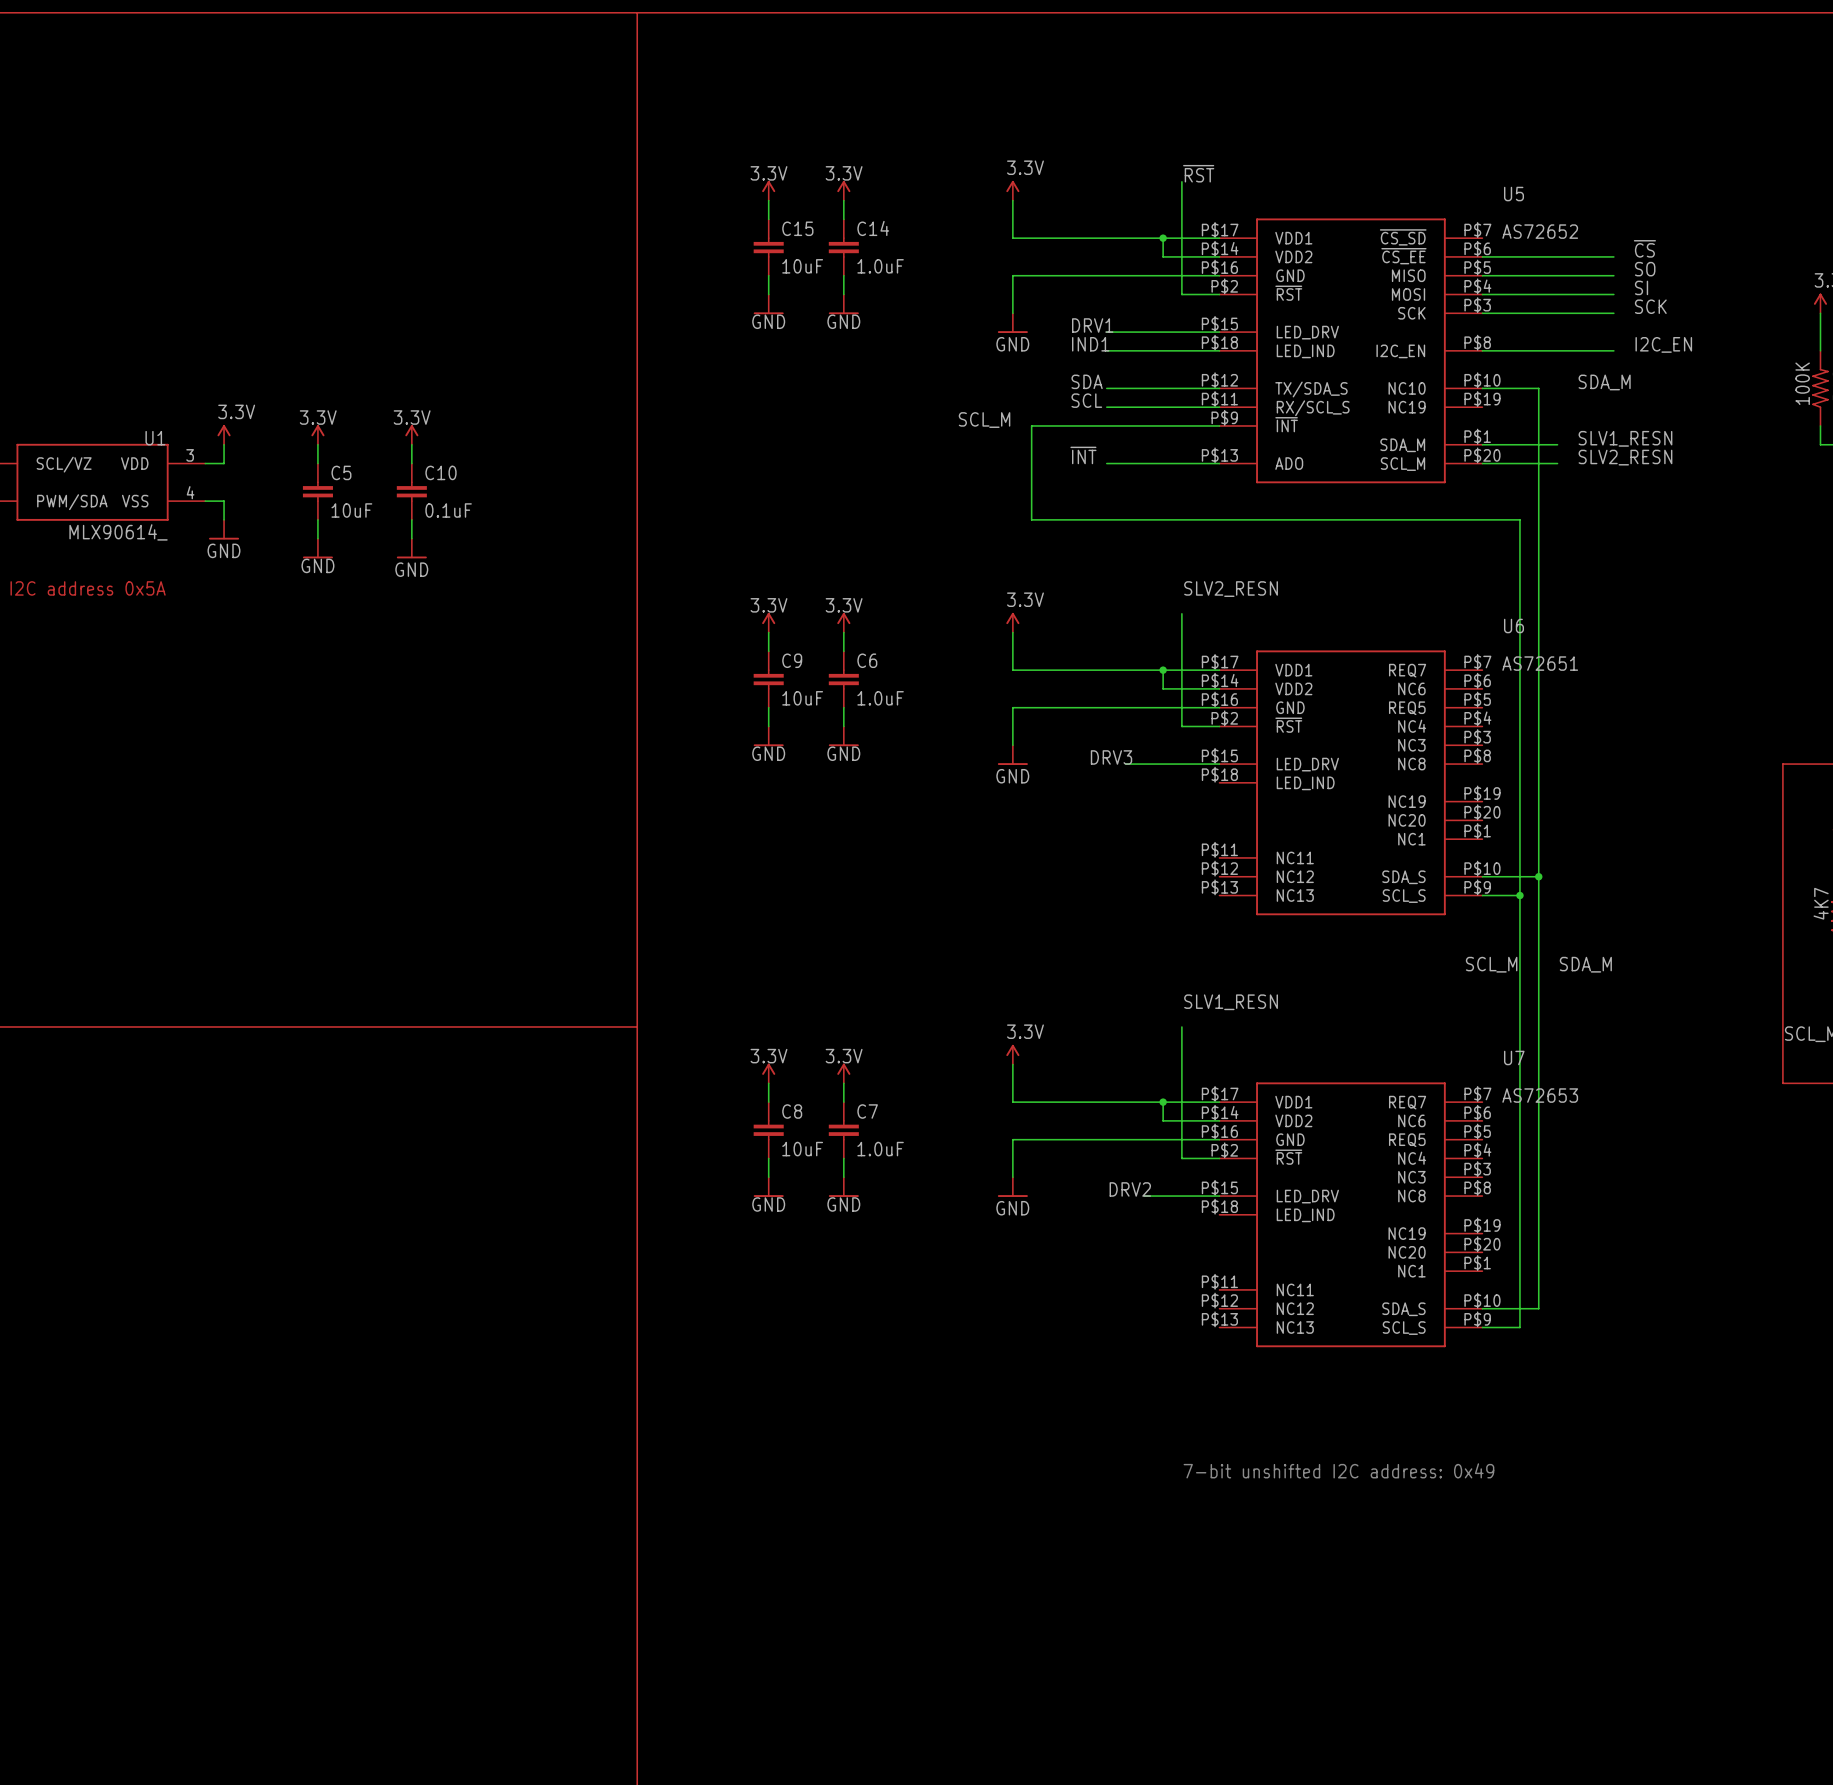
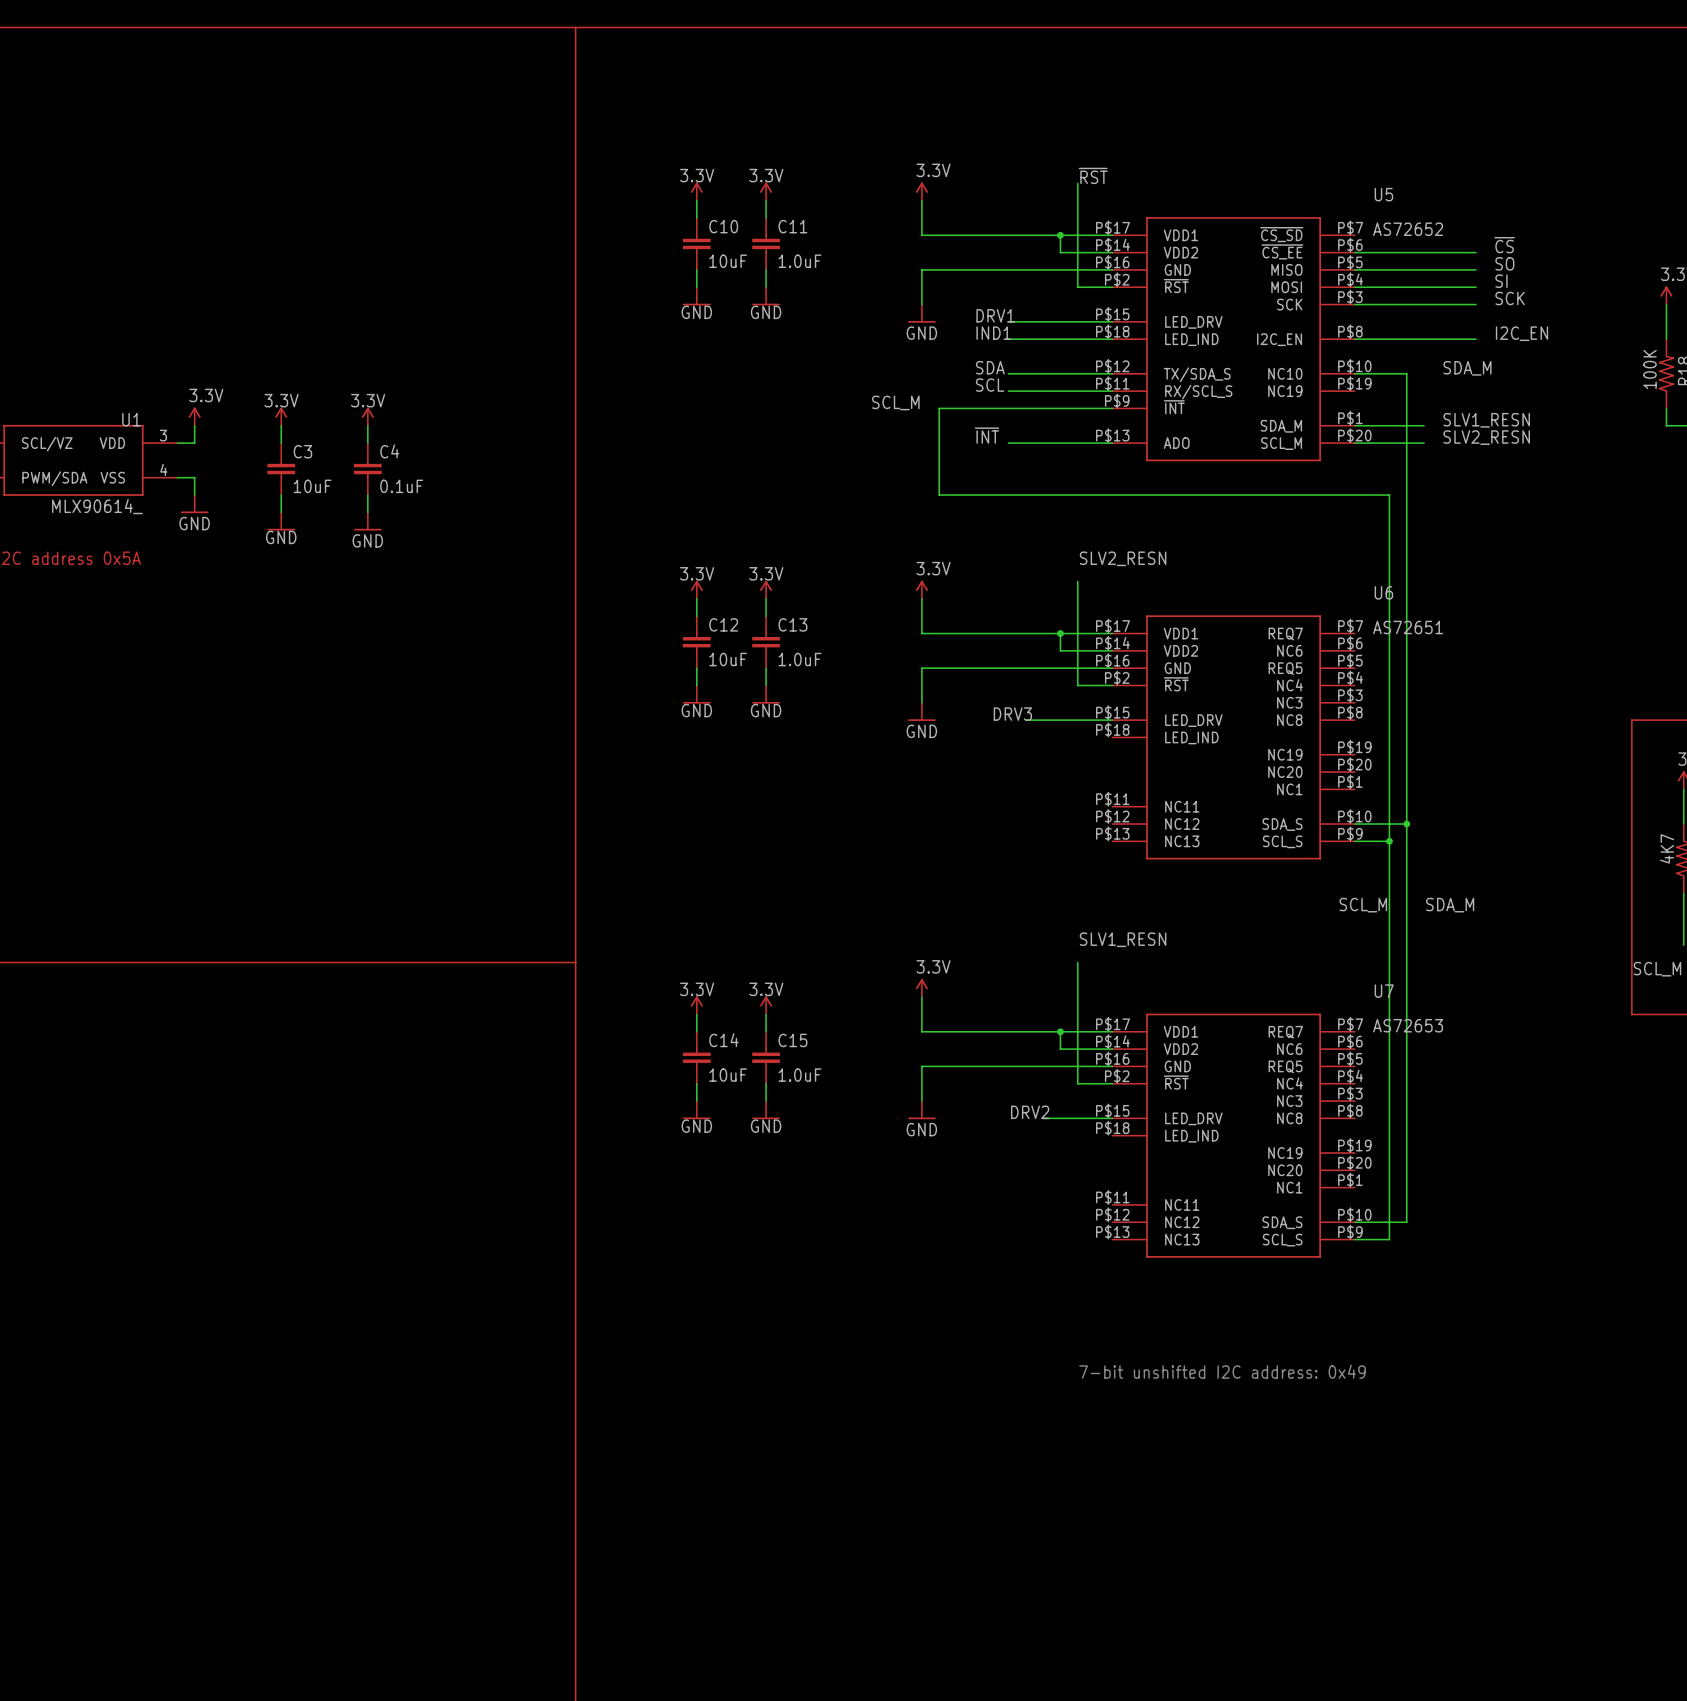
C15 name: C15 (797, 228) -> C10 (723, 226)
C14 name: C14 (873, 228) -> C11 (792, 226)
C5 name: C5 (341, 472) -> C3 (302, 451)
C10 name: C10 (441, 472) -> C4 (389, 451)
C9 name: C9 (792, 660) -> C12 (723, 624)
C6 name: C6 (867, 660) -> C13 (792, 624)
C8 name: C8 (792, 1111) -> C14 (723, 1040)
C7 name: C7 (867, 1111) -> C15 (792, 1040)

